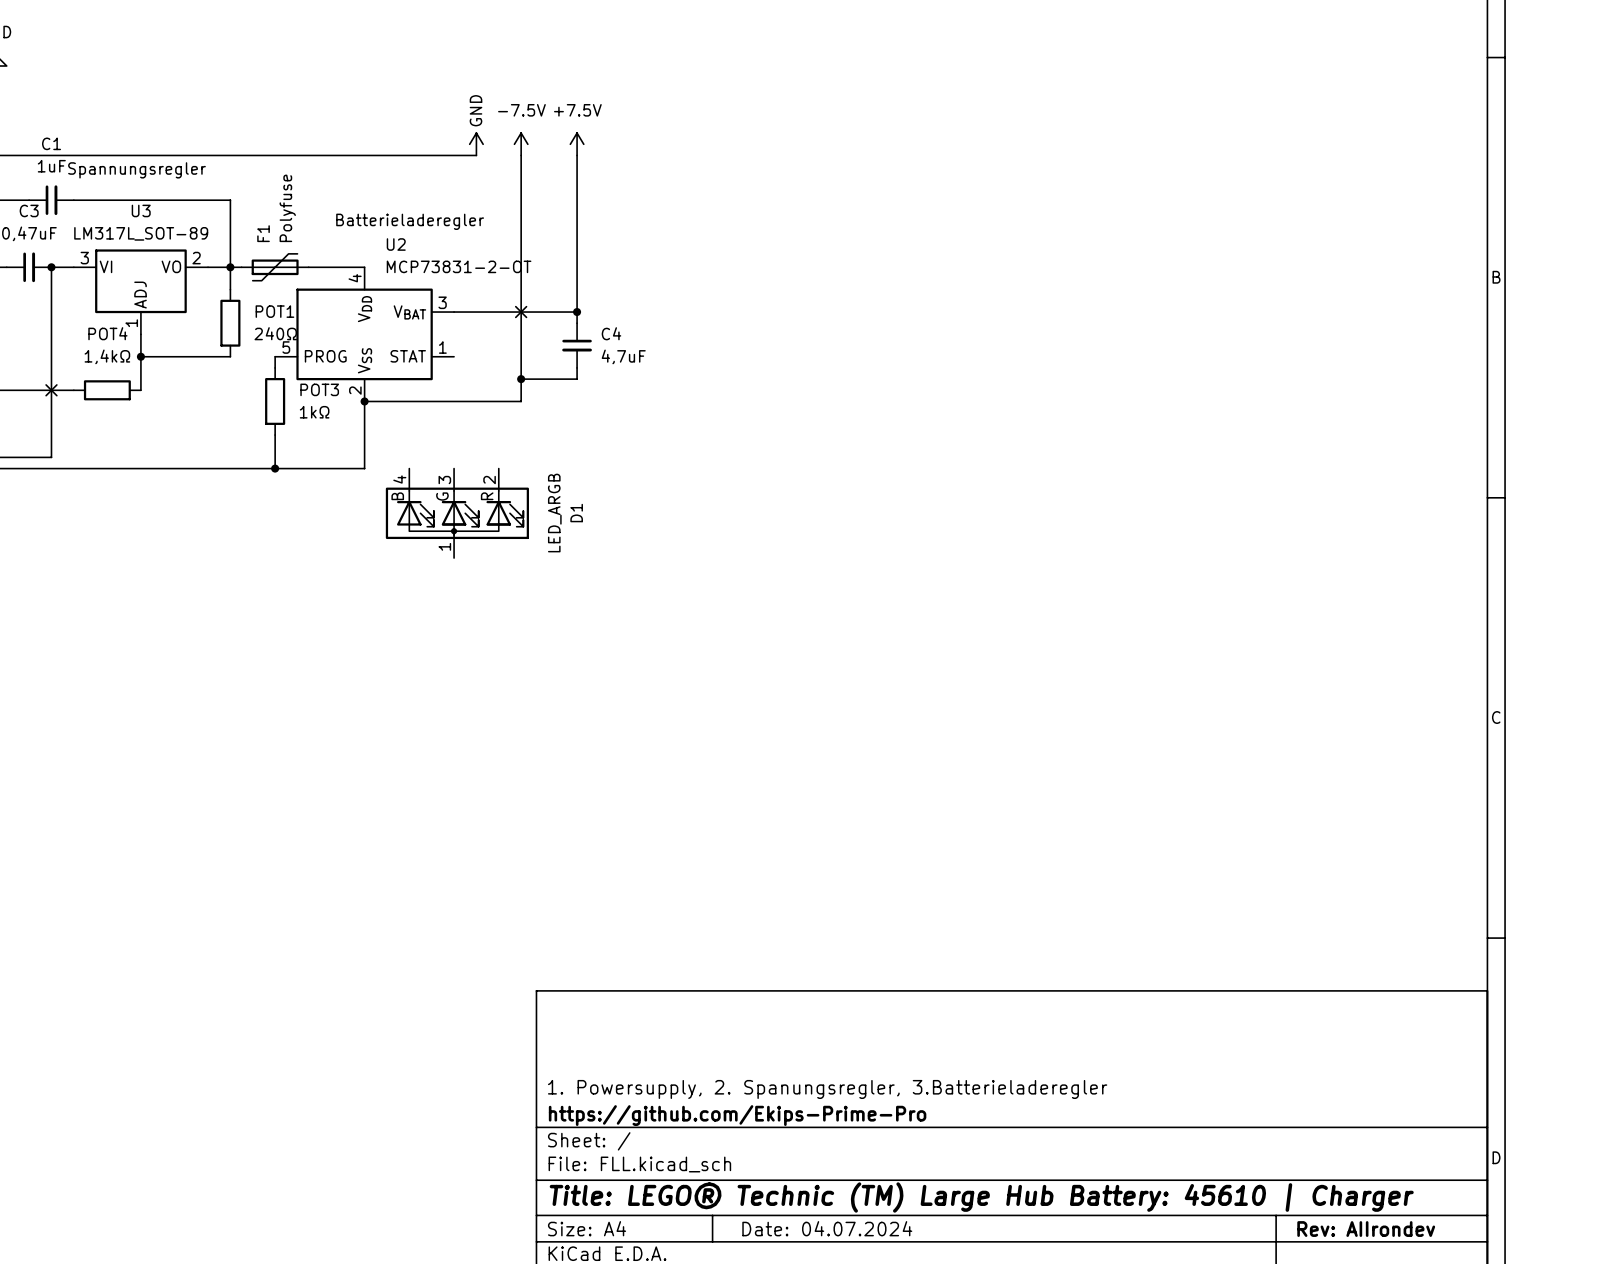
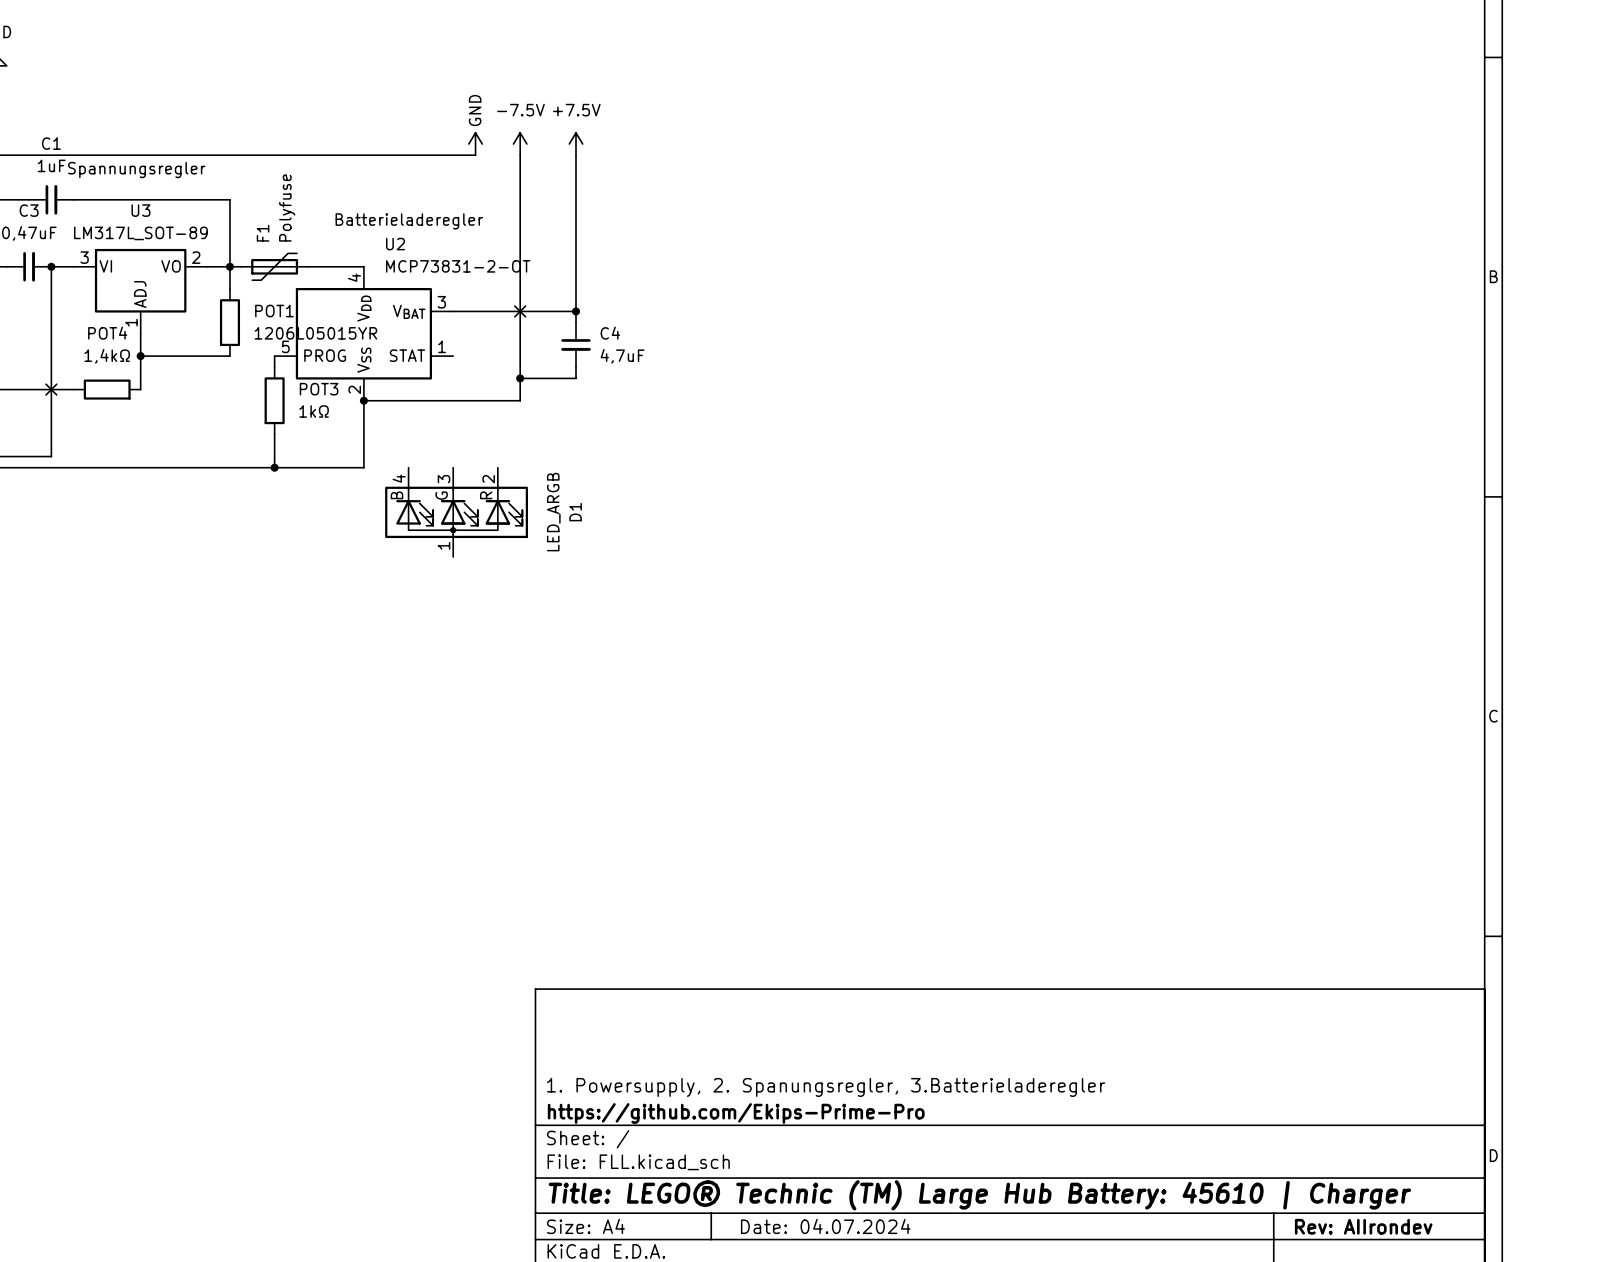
POT1 value: 240Ω (275, 333) -> 1206L05015YR (315, 333)

